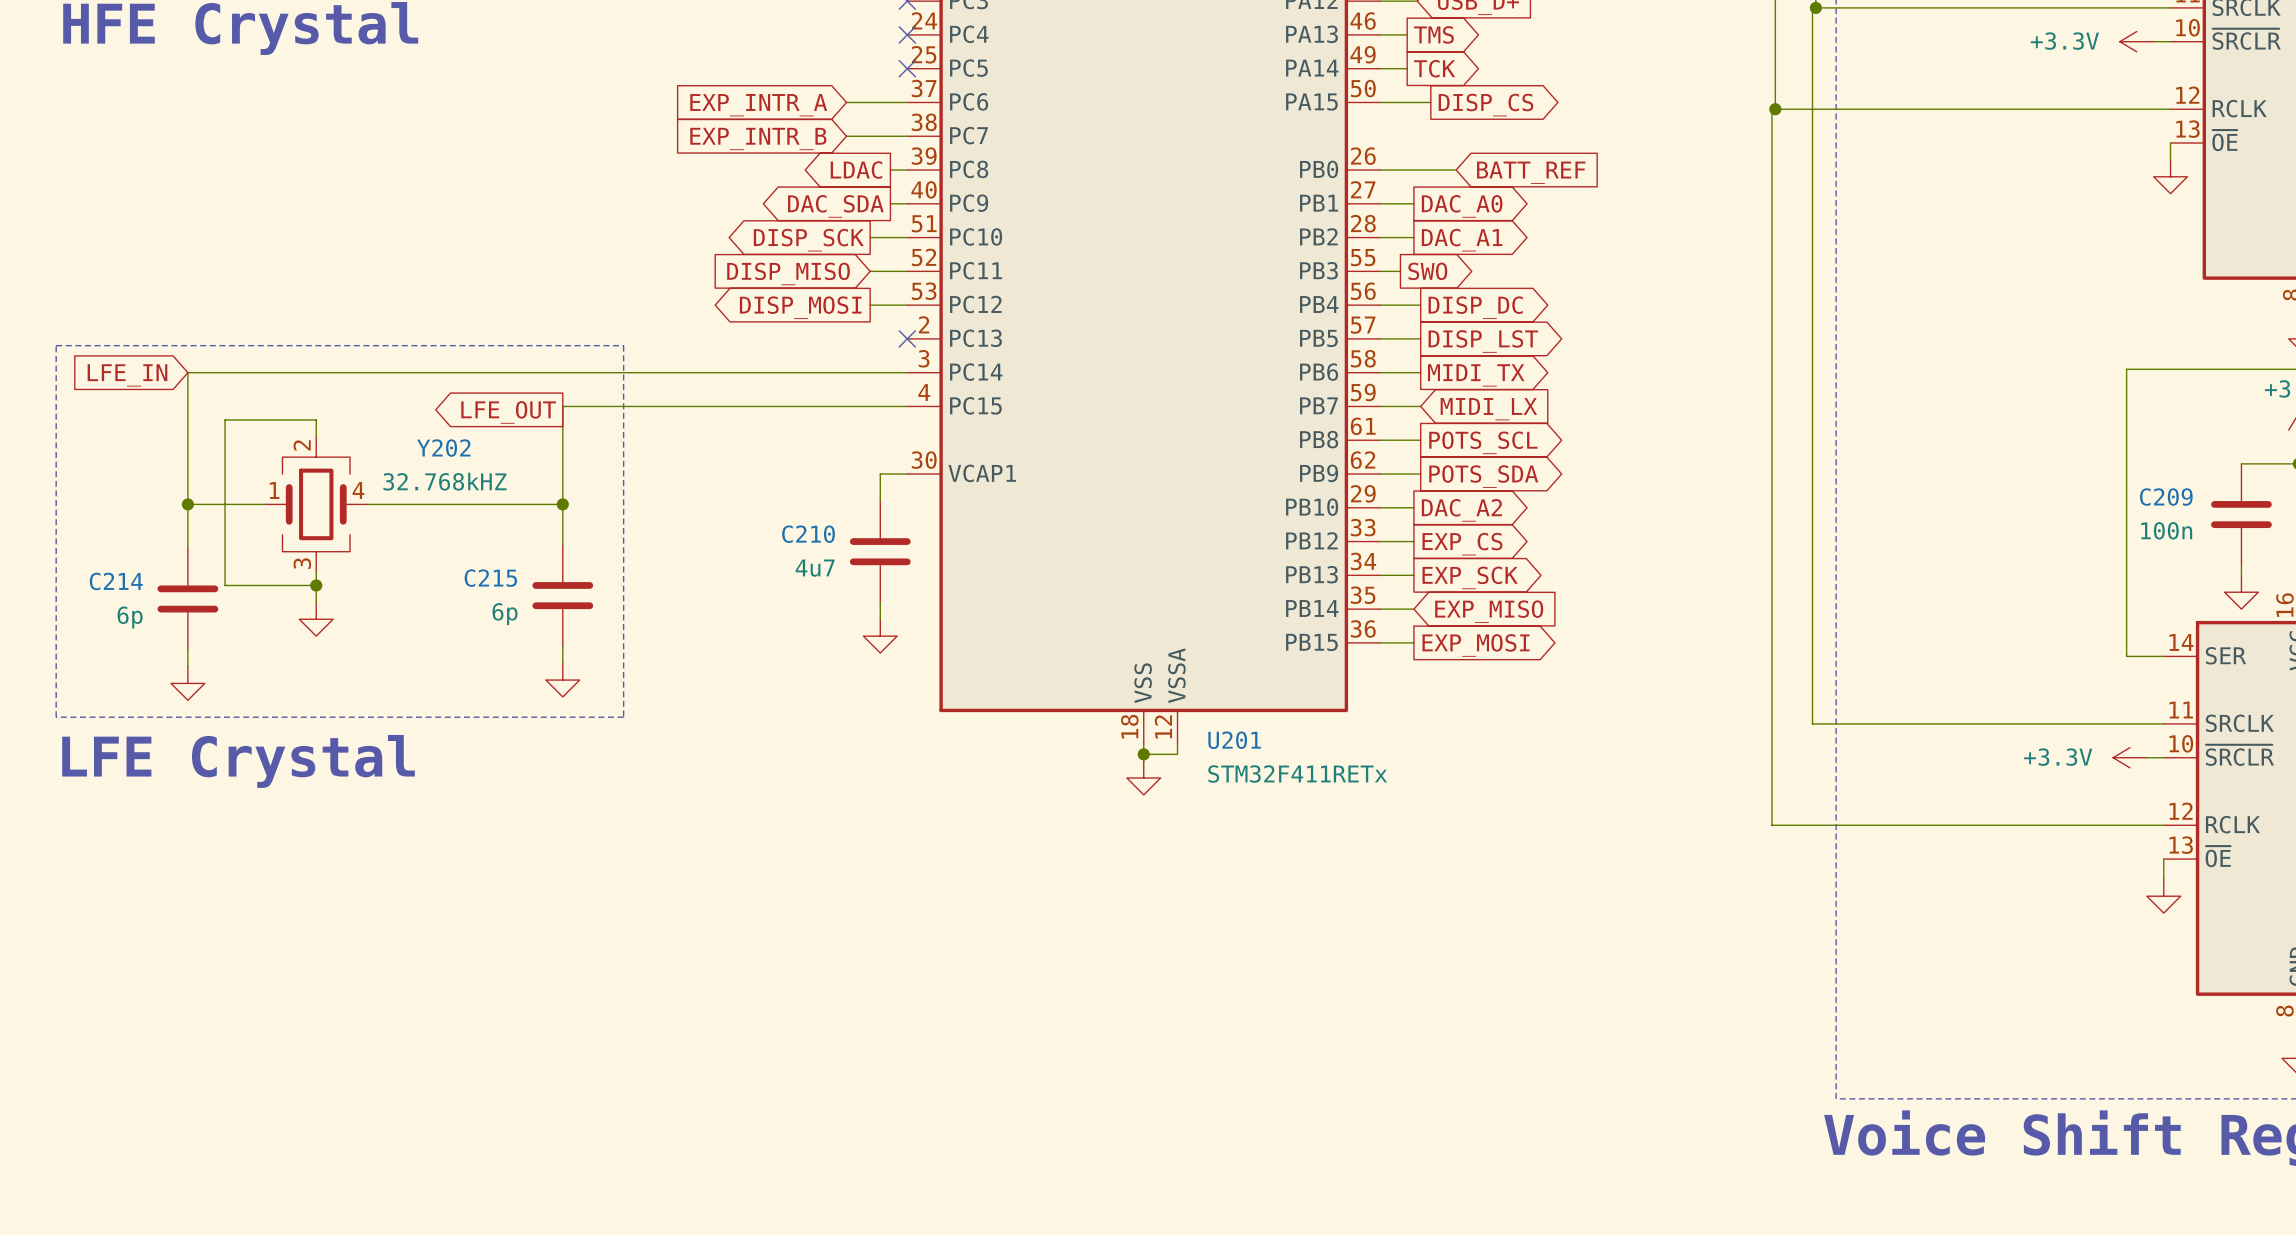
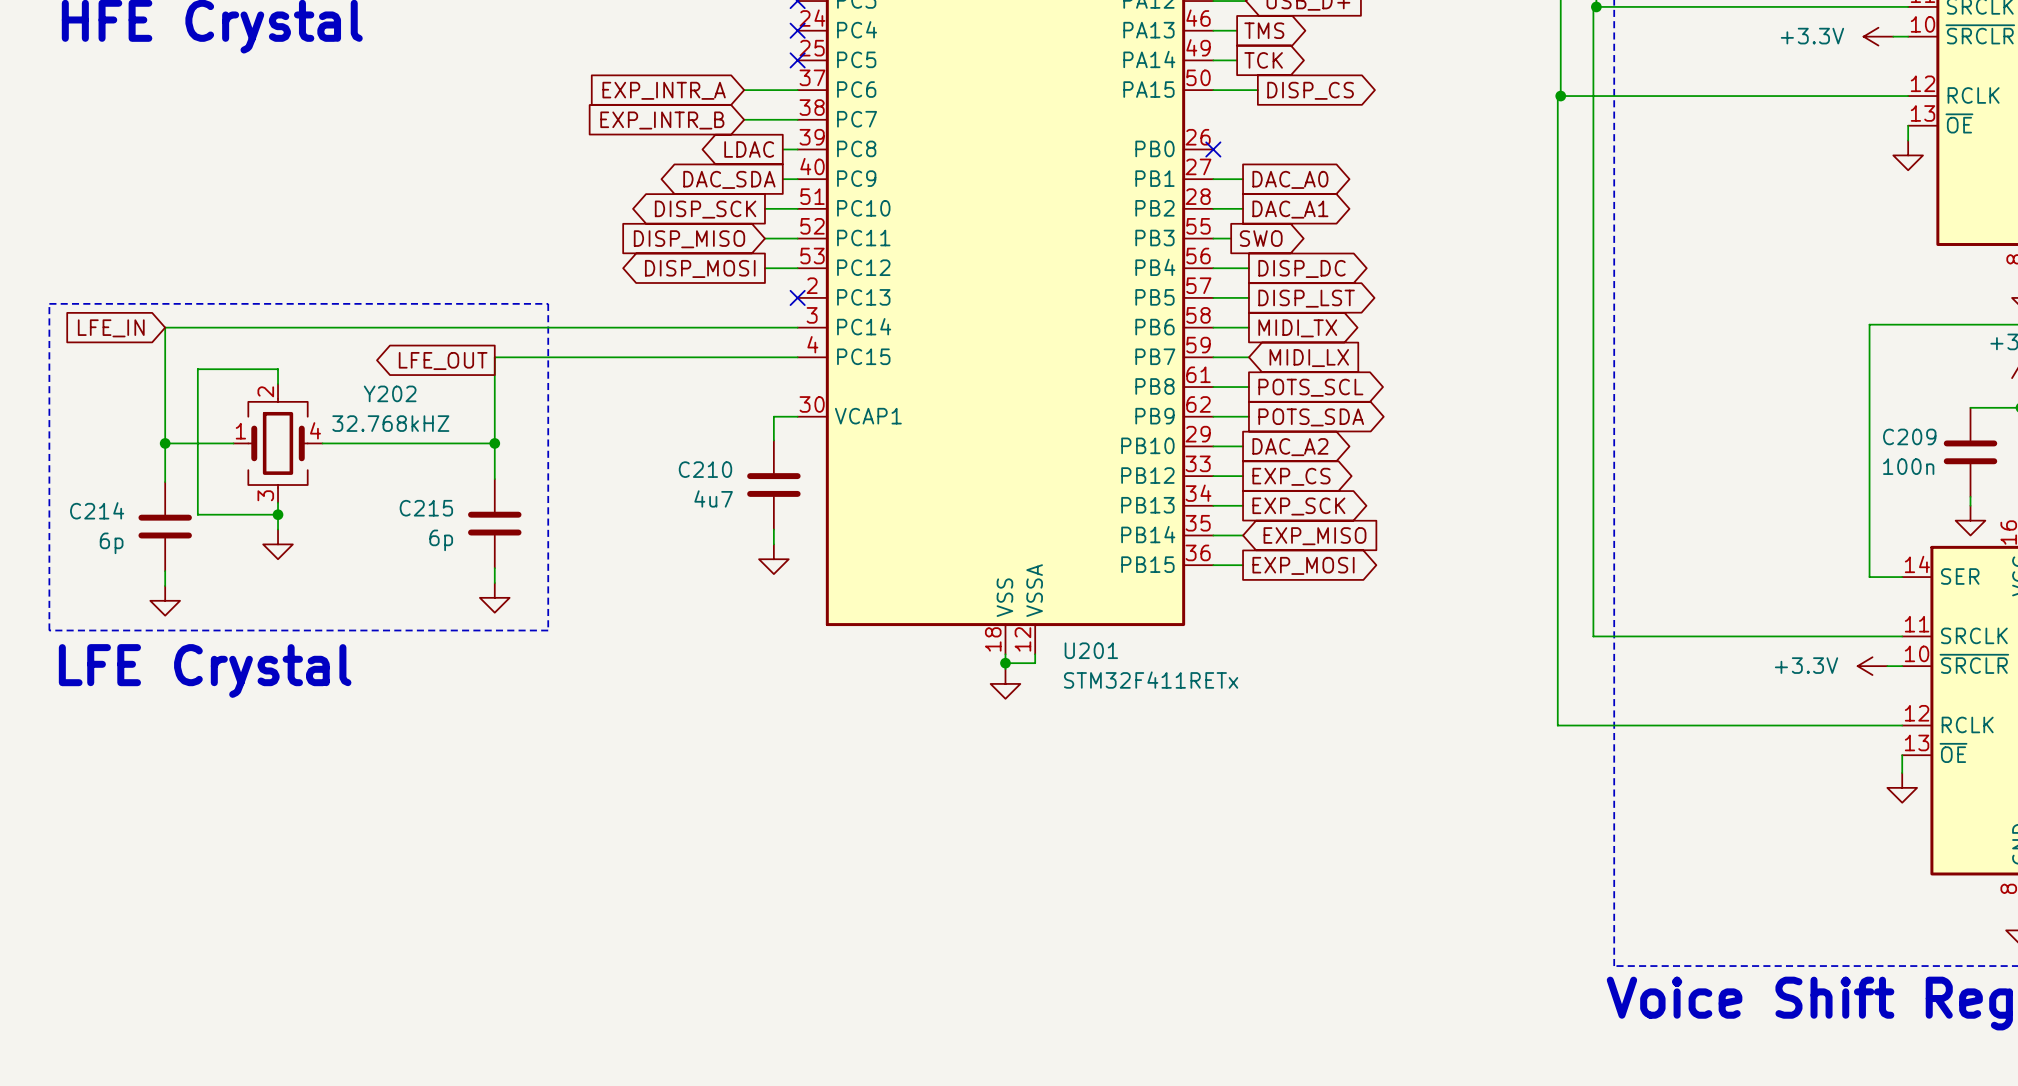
wire: (1380, 170) (1456, 170) -> none
no-connect mark: none -> (1213, 149)
global label: BATT_REF (1531, 172) -> none

